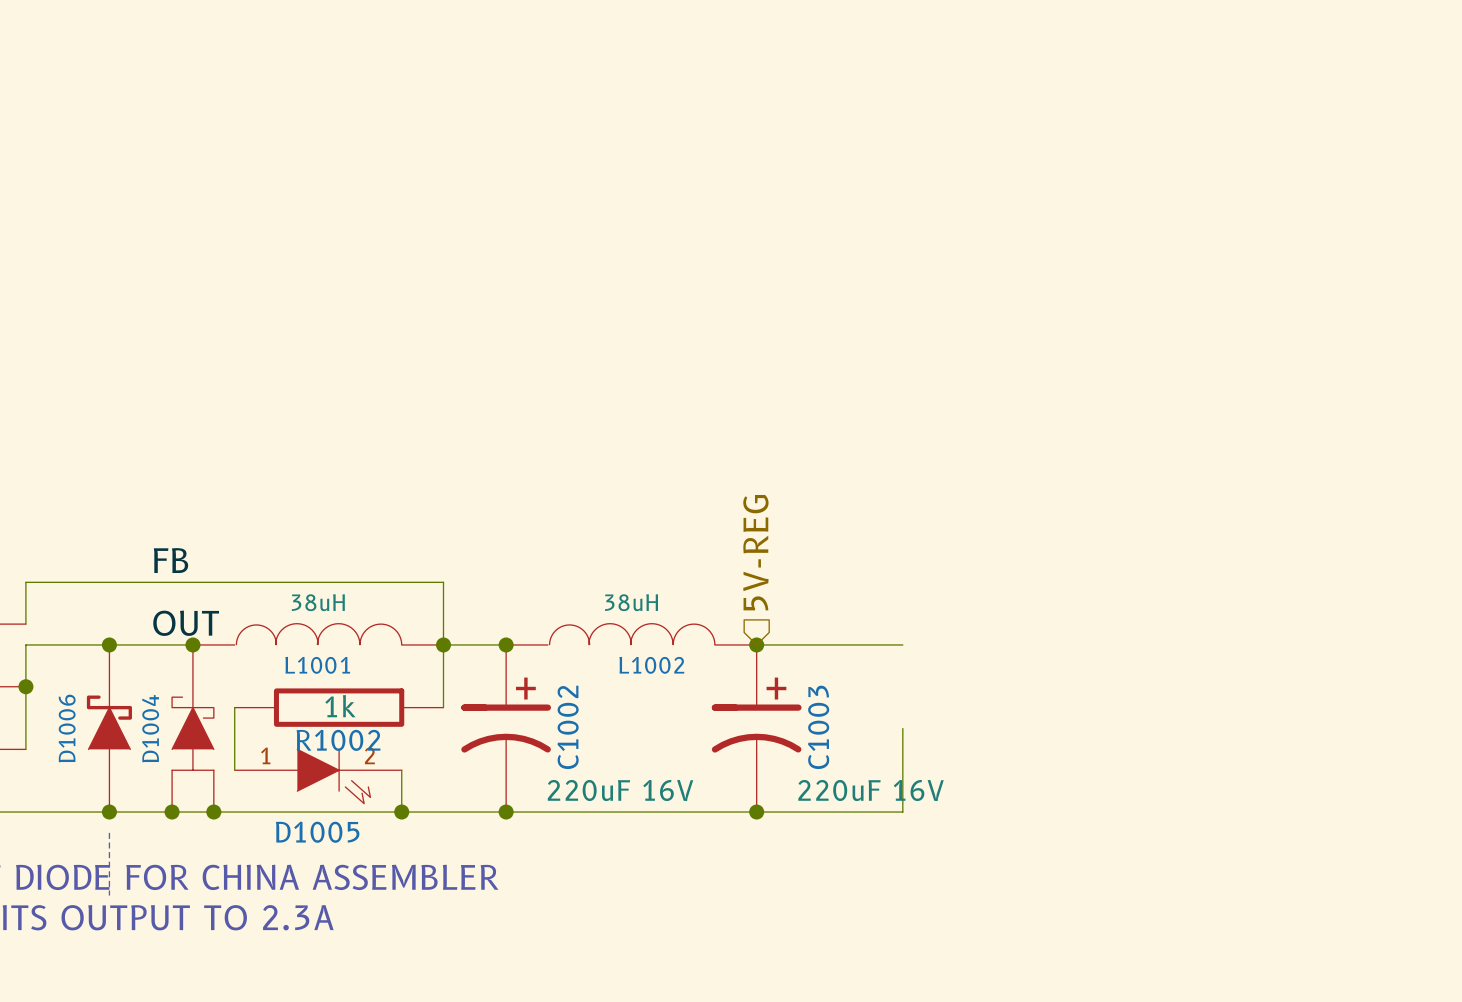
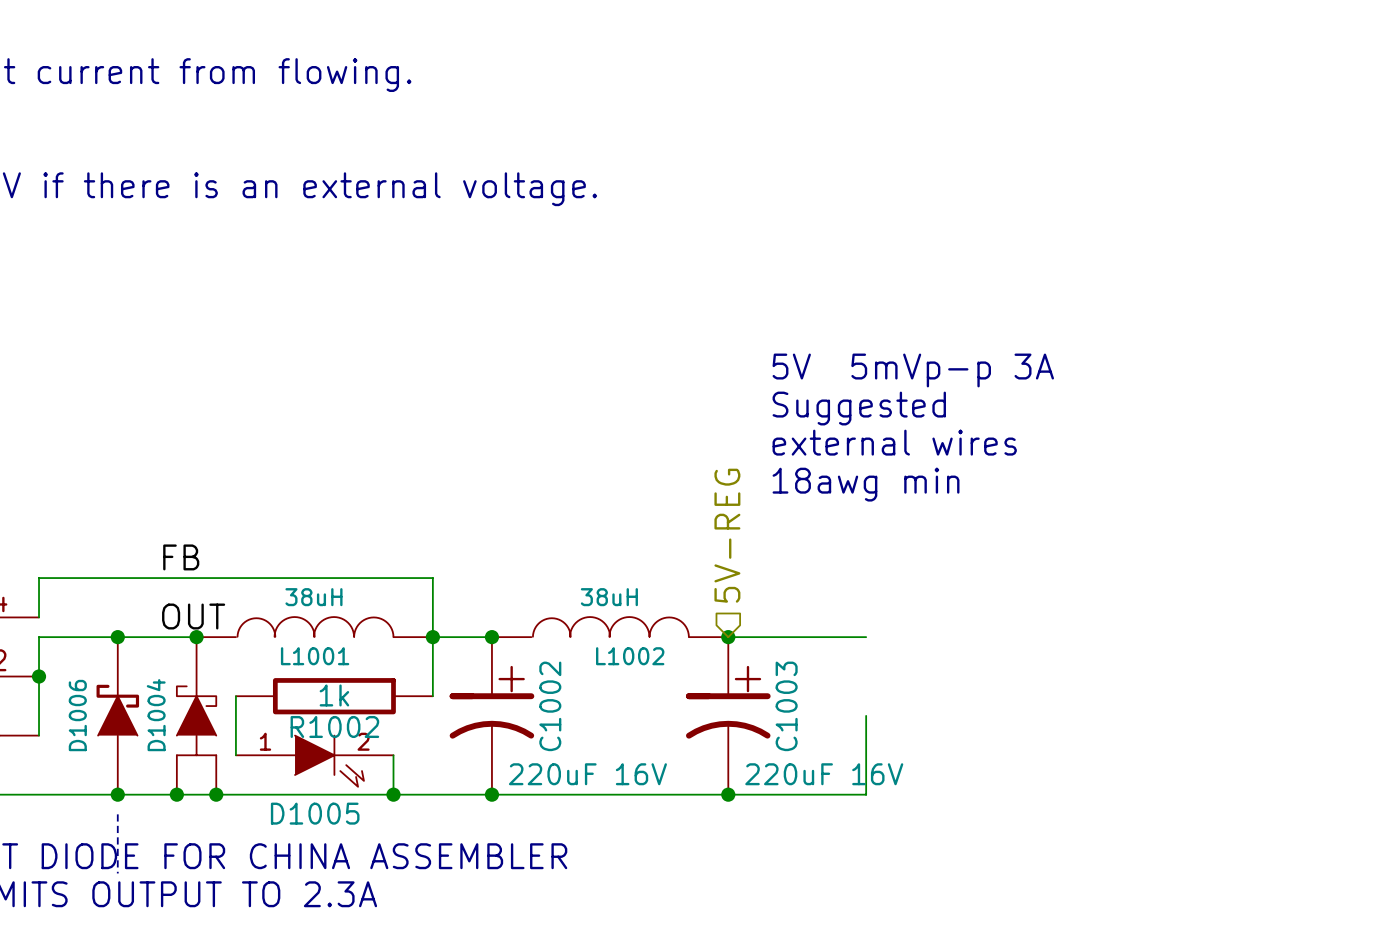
text: none -> 5V 5mVp-p 3A (913, 370)
text: none -> Suggested (859, 408)
text: none -> external wires (894, 442)
text: none -> 18awg min (866, 484)

